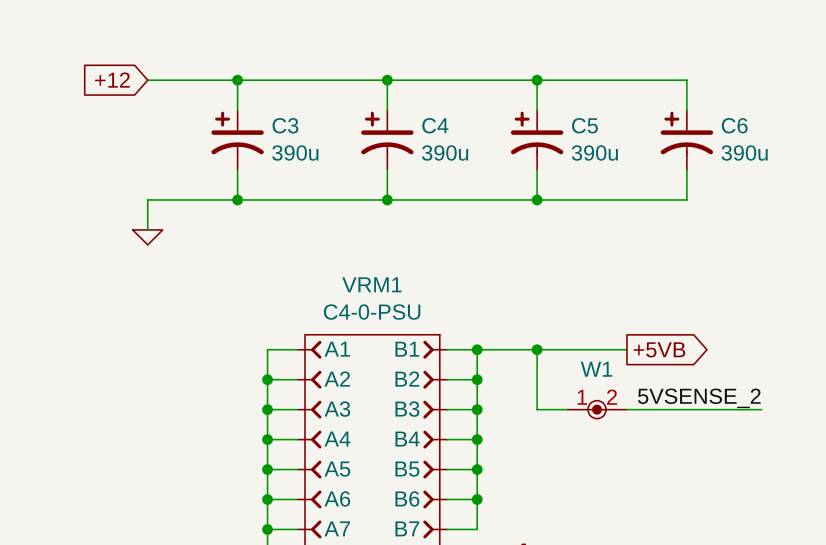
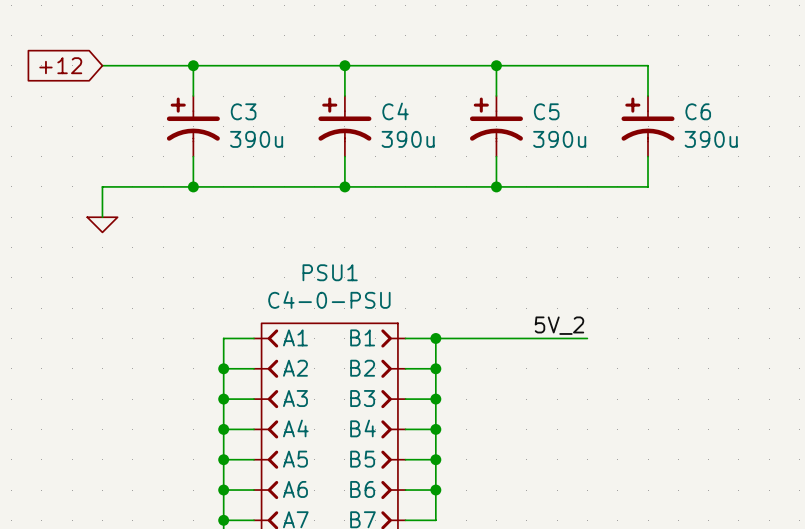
VRM1 name: VRM1 (371, 284) -> PSU1 (330, 272)
label: none -> 5V_2 (559, 325)
wire: (537, 349) (537, 409) (567, 409) -> none
junction: (537, 349) -> none
global label: +5VB (659, 349) -> none
label: 5VSENSE_2 (699, 398) -> none
W1: (597, 409) -> none
wire: (626, 409) (761, 409) -> none

